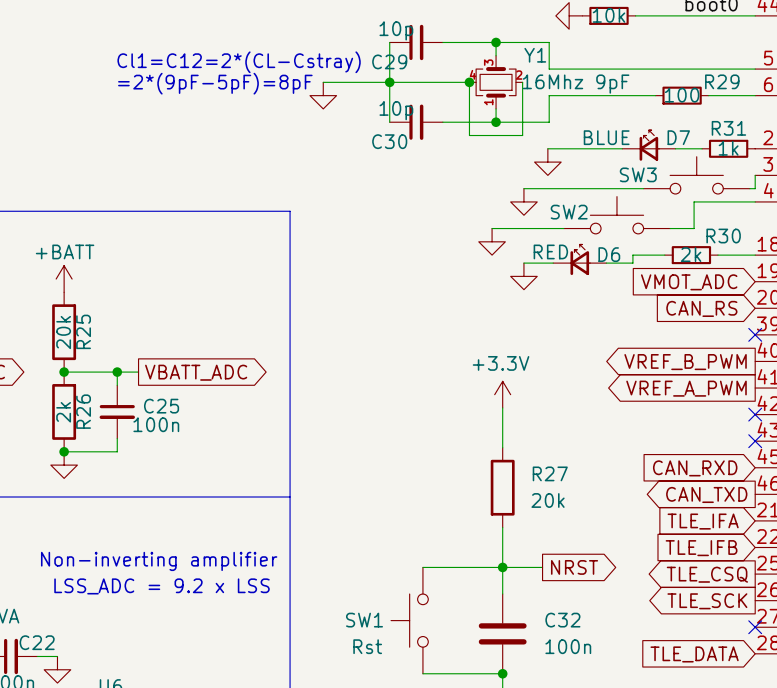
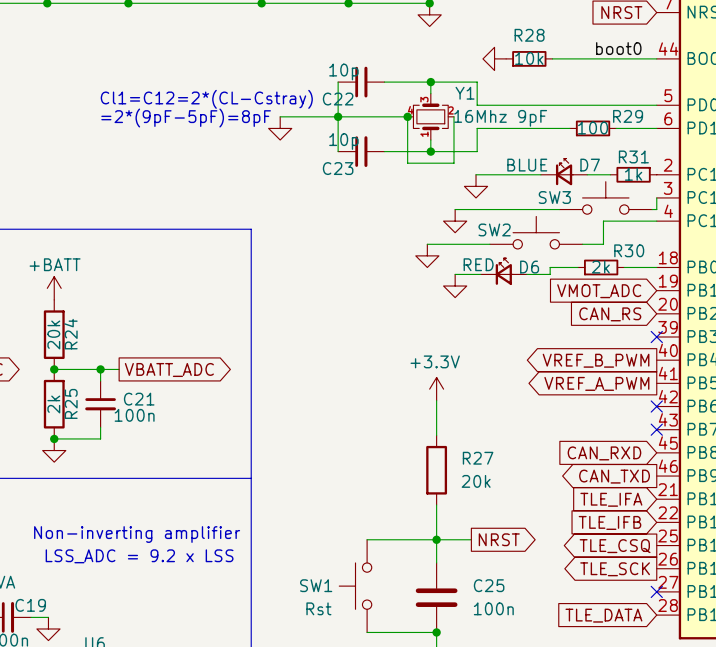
C29 name: C29 (389, 61) -> C22 (338, 99)
C30 name: C30 (389, 141) -> C23 (338, 168)
R25 name: R25 (83, 331) -> R24 (70, 334)
C25 name: C25 (161, 406) -> C21 (139, 399)
R26 name: R26 (83, 411) -> R25 (71, 403)
C32 name: C32 (562, 620) -> C25 (489, 585)
C22 name: C22 (37, 642) -> C19 (30, 605)

